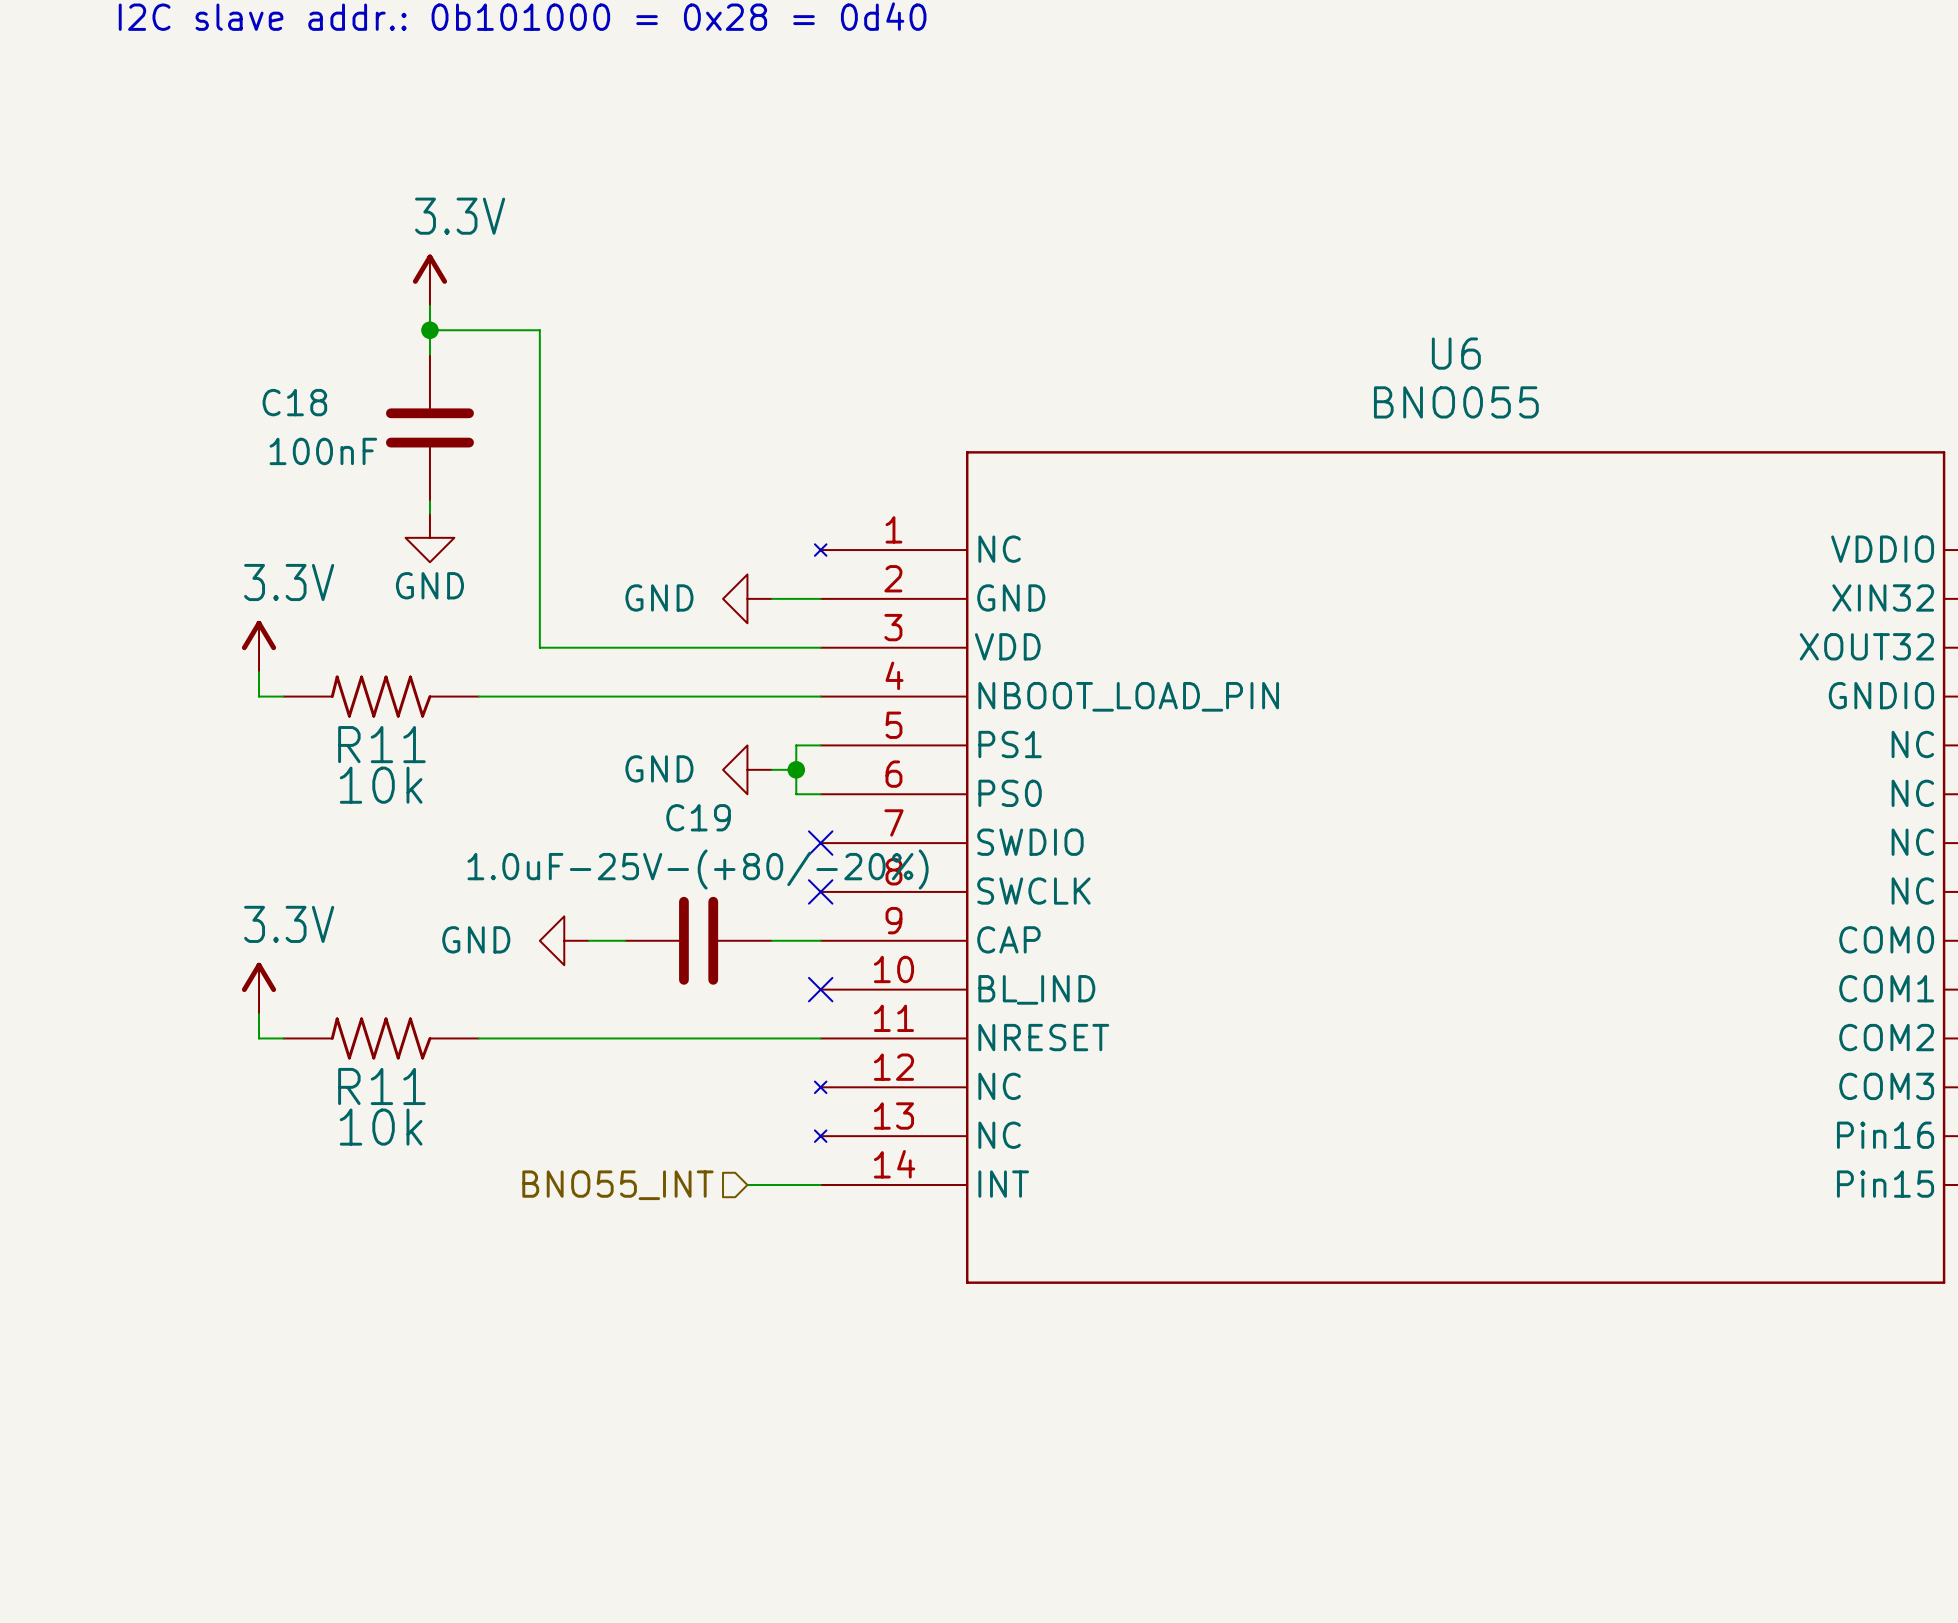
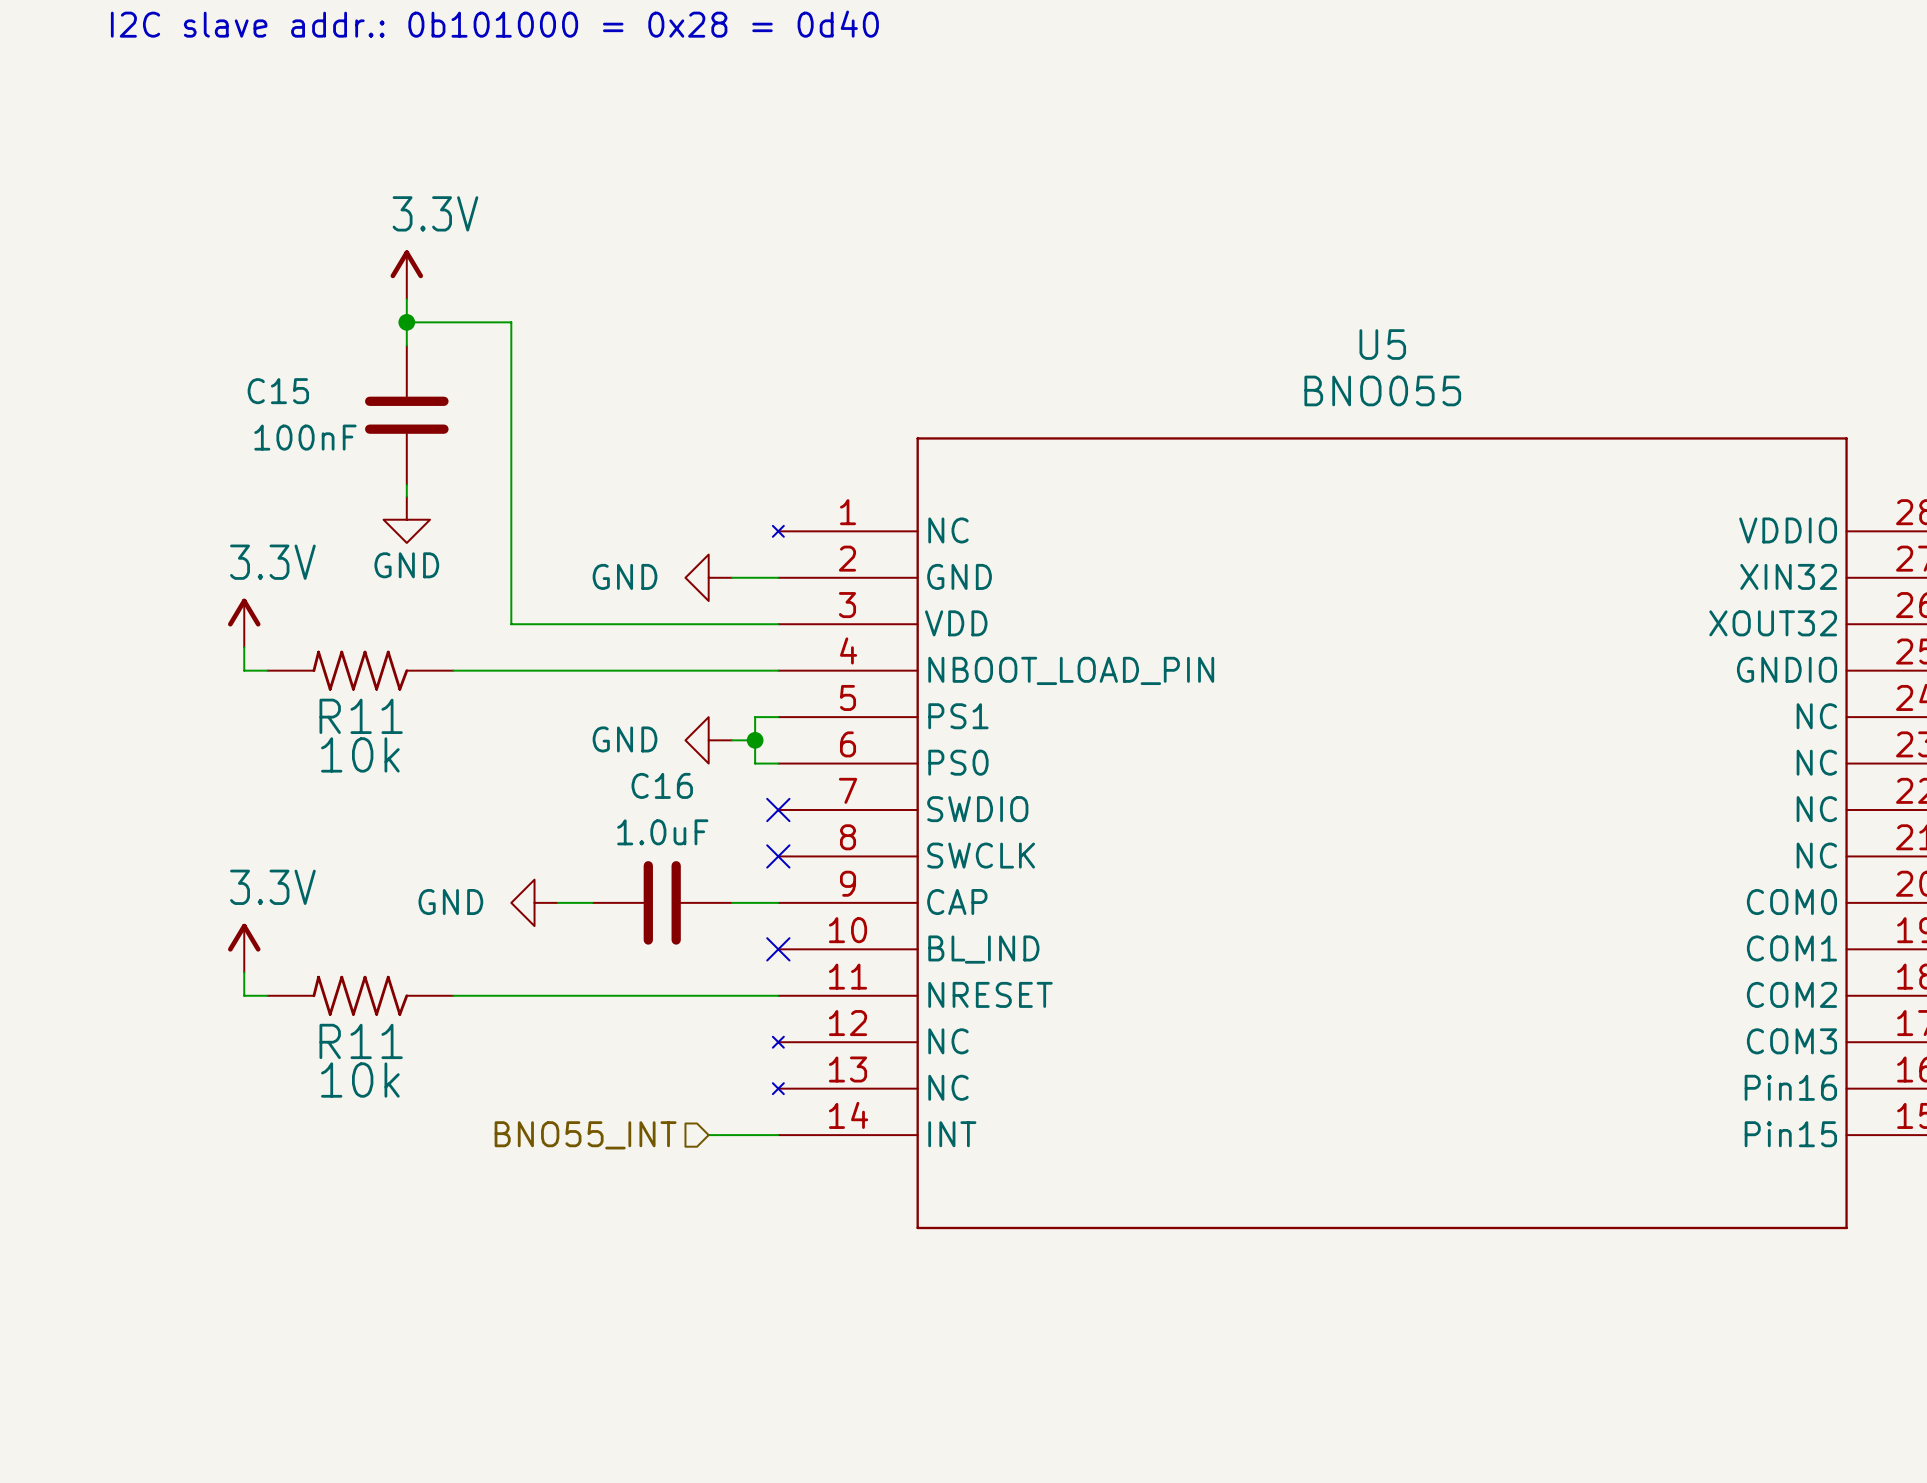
U6 name: U6 (1456, 353) -> U5 (1382, 344)
C18 name: C18 (294, 402) -> C15 (278, 391)
C19 name: C19 (698, 817) -> C16 (662, 785)
C19 value: 1.0uF-25V-(+80/-20%) (698, 869) -> 1.0uF (662, 832)

